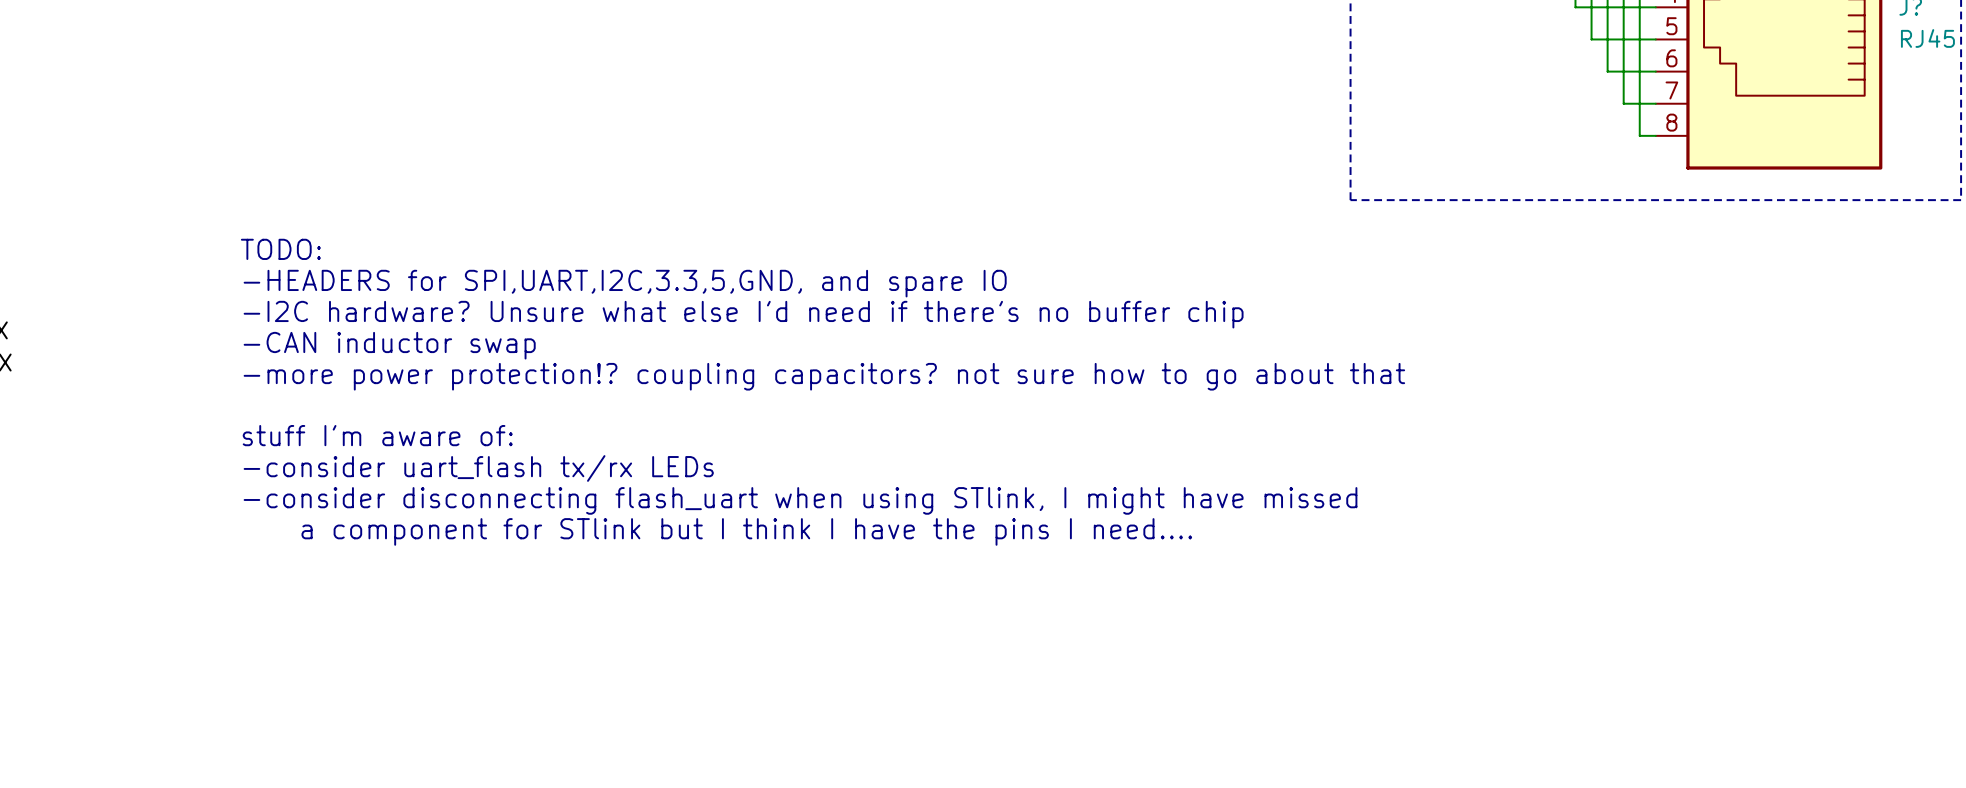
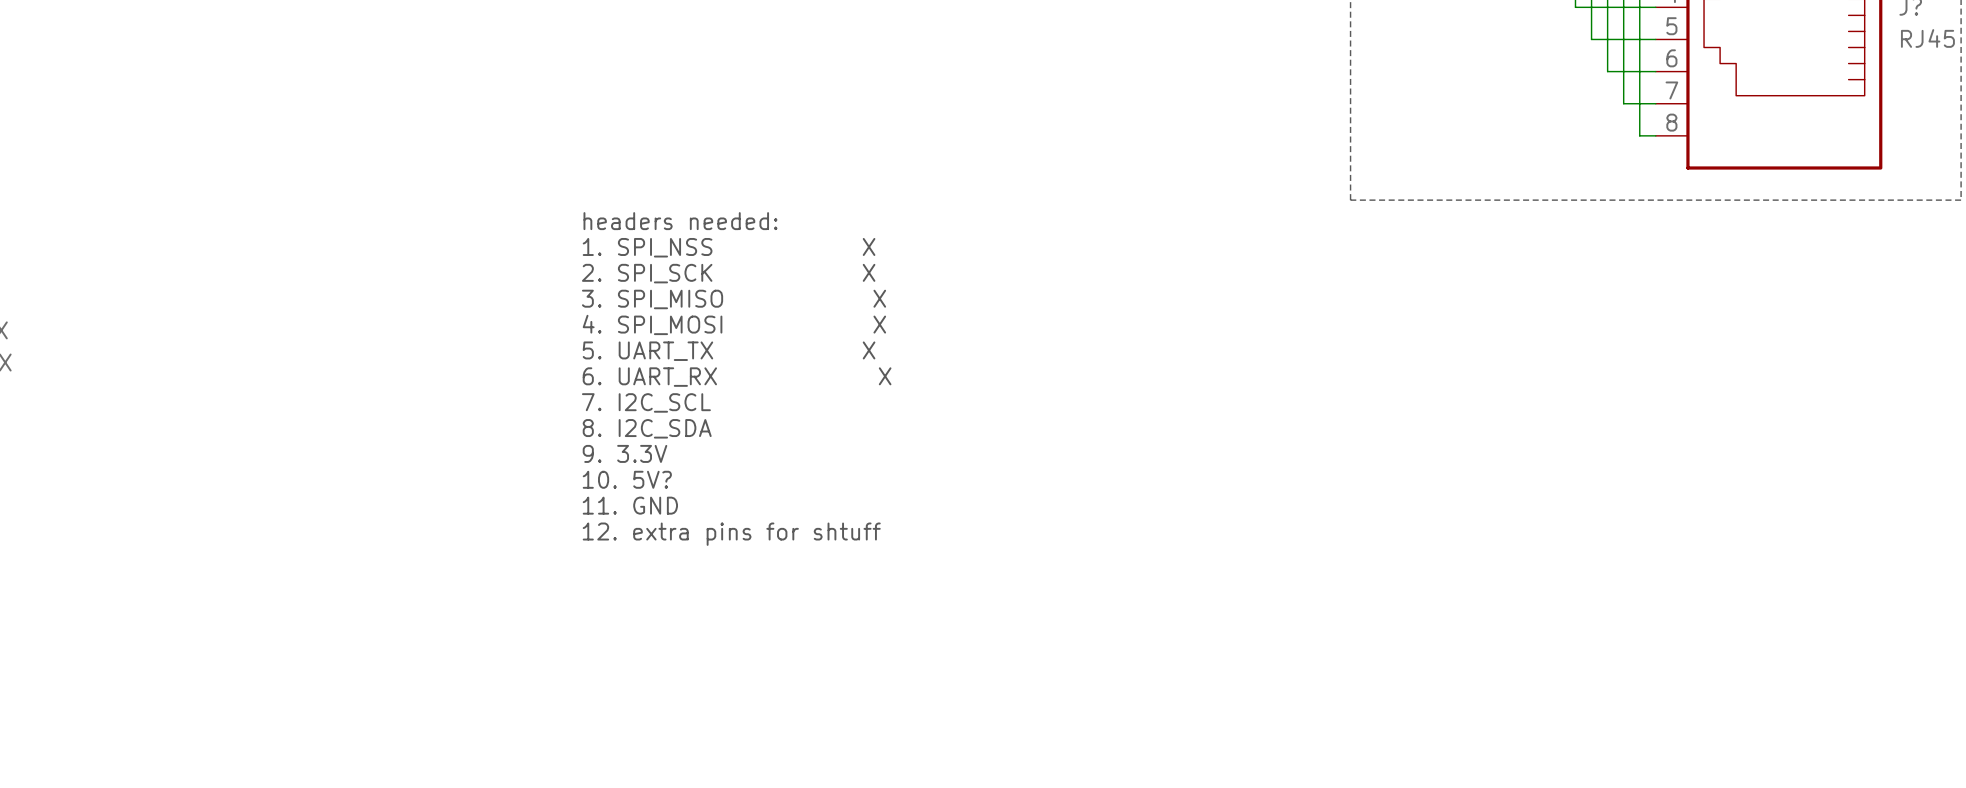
text: none -> headers needed: (680, 221)
text: none -> 1. SPI_NSS X (729, 247)
text: TODO: (280, 249) -> none
text: none -> 2. SPI_SCK X (728, 273)
text: -HEADERS for SPI,UART,I2C,3.3,5,GND, and spare IO (625, 283) -> none
text: none -> 3. SPI_MISO X (734, 299)
text: -I2C hardware? Unsure what else I'd need if there's no buffer chip (743, 314) -> none
text: none -> 4. SPI_MOSI X (734, 324)
text: -CAN inductor swap (389, 345) -> none
text: none -> 5. UART_TX X (729, 351)
text: -more power protection!? coupling capacitors? not sure how to go about that (824, 376) -> none
text: none -> 6. UART_RX X (737, 377)
text: none -> 7. I2C_SCL (646, 402)
text: none -> 8. I2C_SDA (647, 428)
text: stuff I'm aware of: (377, 435) -> none
text: none -> 9. 3.3V (625, 453)
text: -consider uart_flash tx/rx LEDs (478, 468) -> none
text: none -> 10. 5V? (627, 479)
text: -consider disconnecting flash_uart when using STlink, I might have missed (800, 500) -> none
text: none -> 11. GND (630, 505)
text: a component for STlink but I think I have the pins I need.... (746, 531) -> none
text: none -> 12. extra pins for shtuff (731, 534)

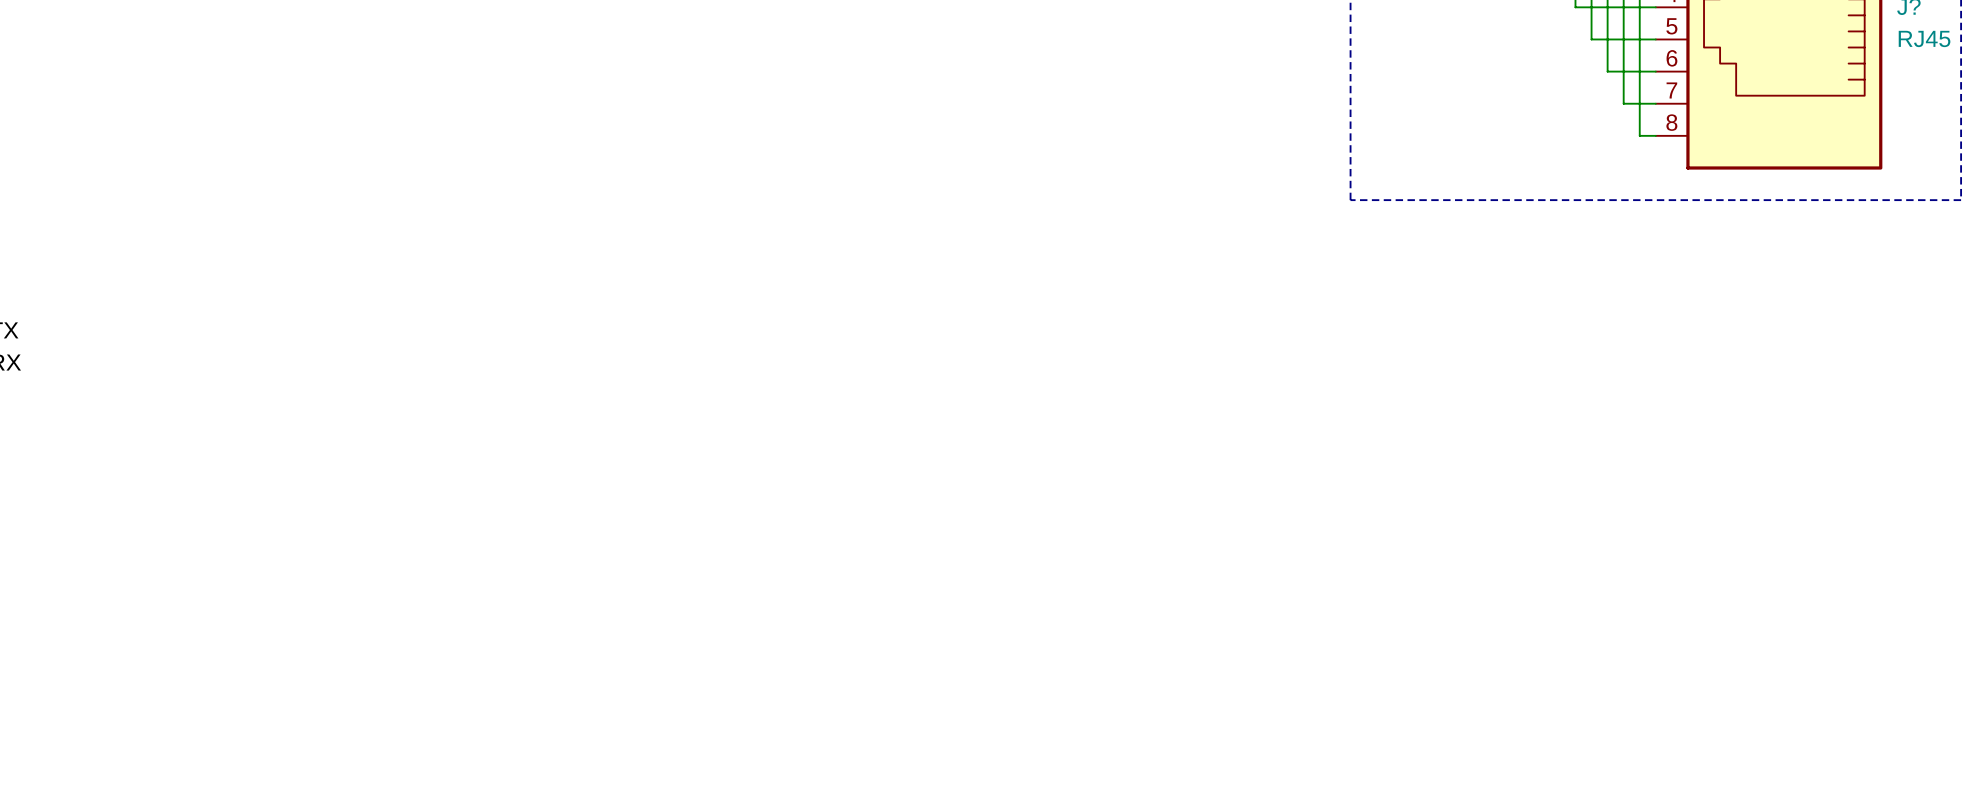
text: headers needed: (680, 221) -> none
text: 1. SPI_NSS X (729, 247) -> none
text: 2. SPI_SCK X (728, 273) -> none
text: 3. SPI_MISO X (734, 299) -> none
text: 4. SPI_MOSI X (734, 324) -> none
text: 5. UART_TX X (729, 351) -> none
text: 6. UART_RX X (737, 377) -> none
text: 7. I2C_SCL (646, 402) -> none
text: 8. I2C_SDA (647, 428) -> none
text: 9. 3.3V (625, 453) -> none
text: 10. 5V? (627, 479) -> none
text: 11. GND (630, 505) -> none
text: 12. extra pins for shtuff (731, 534) -> none

